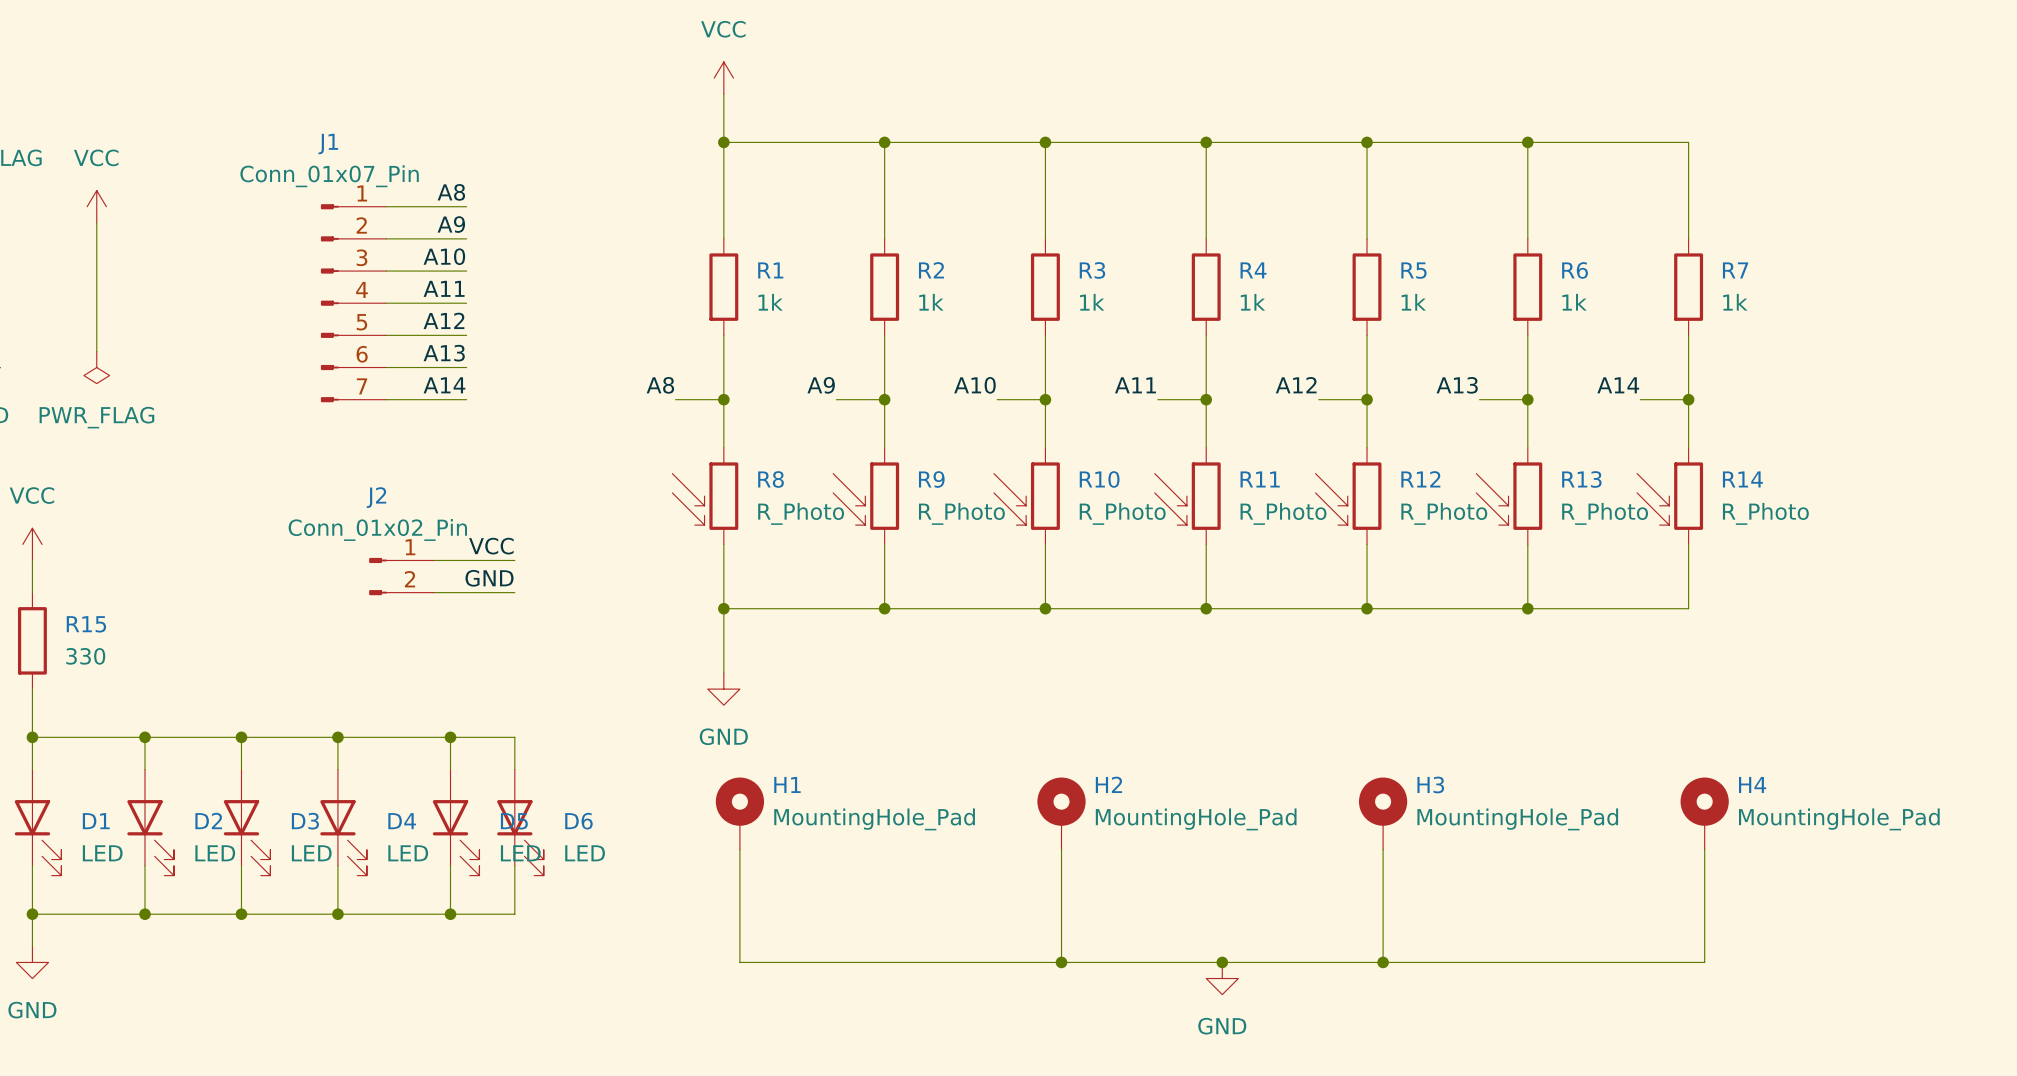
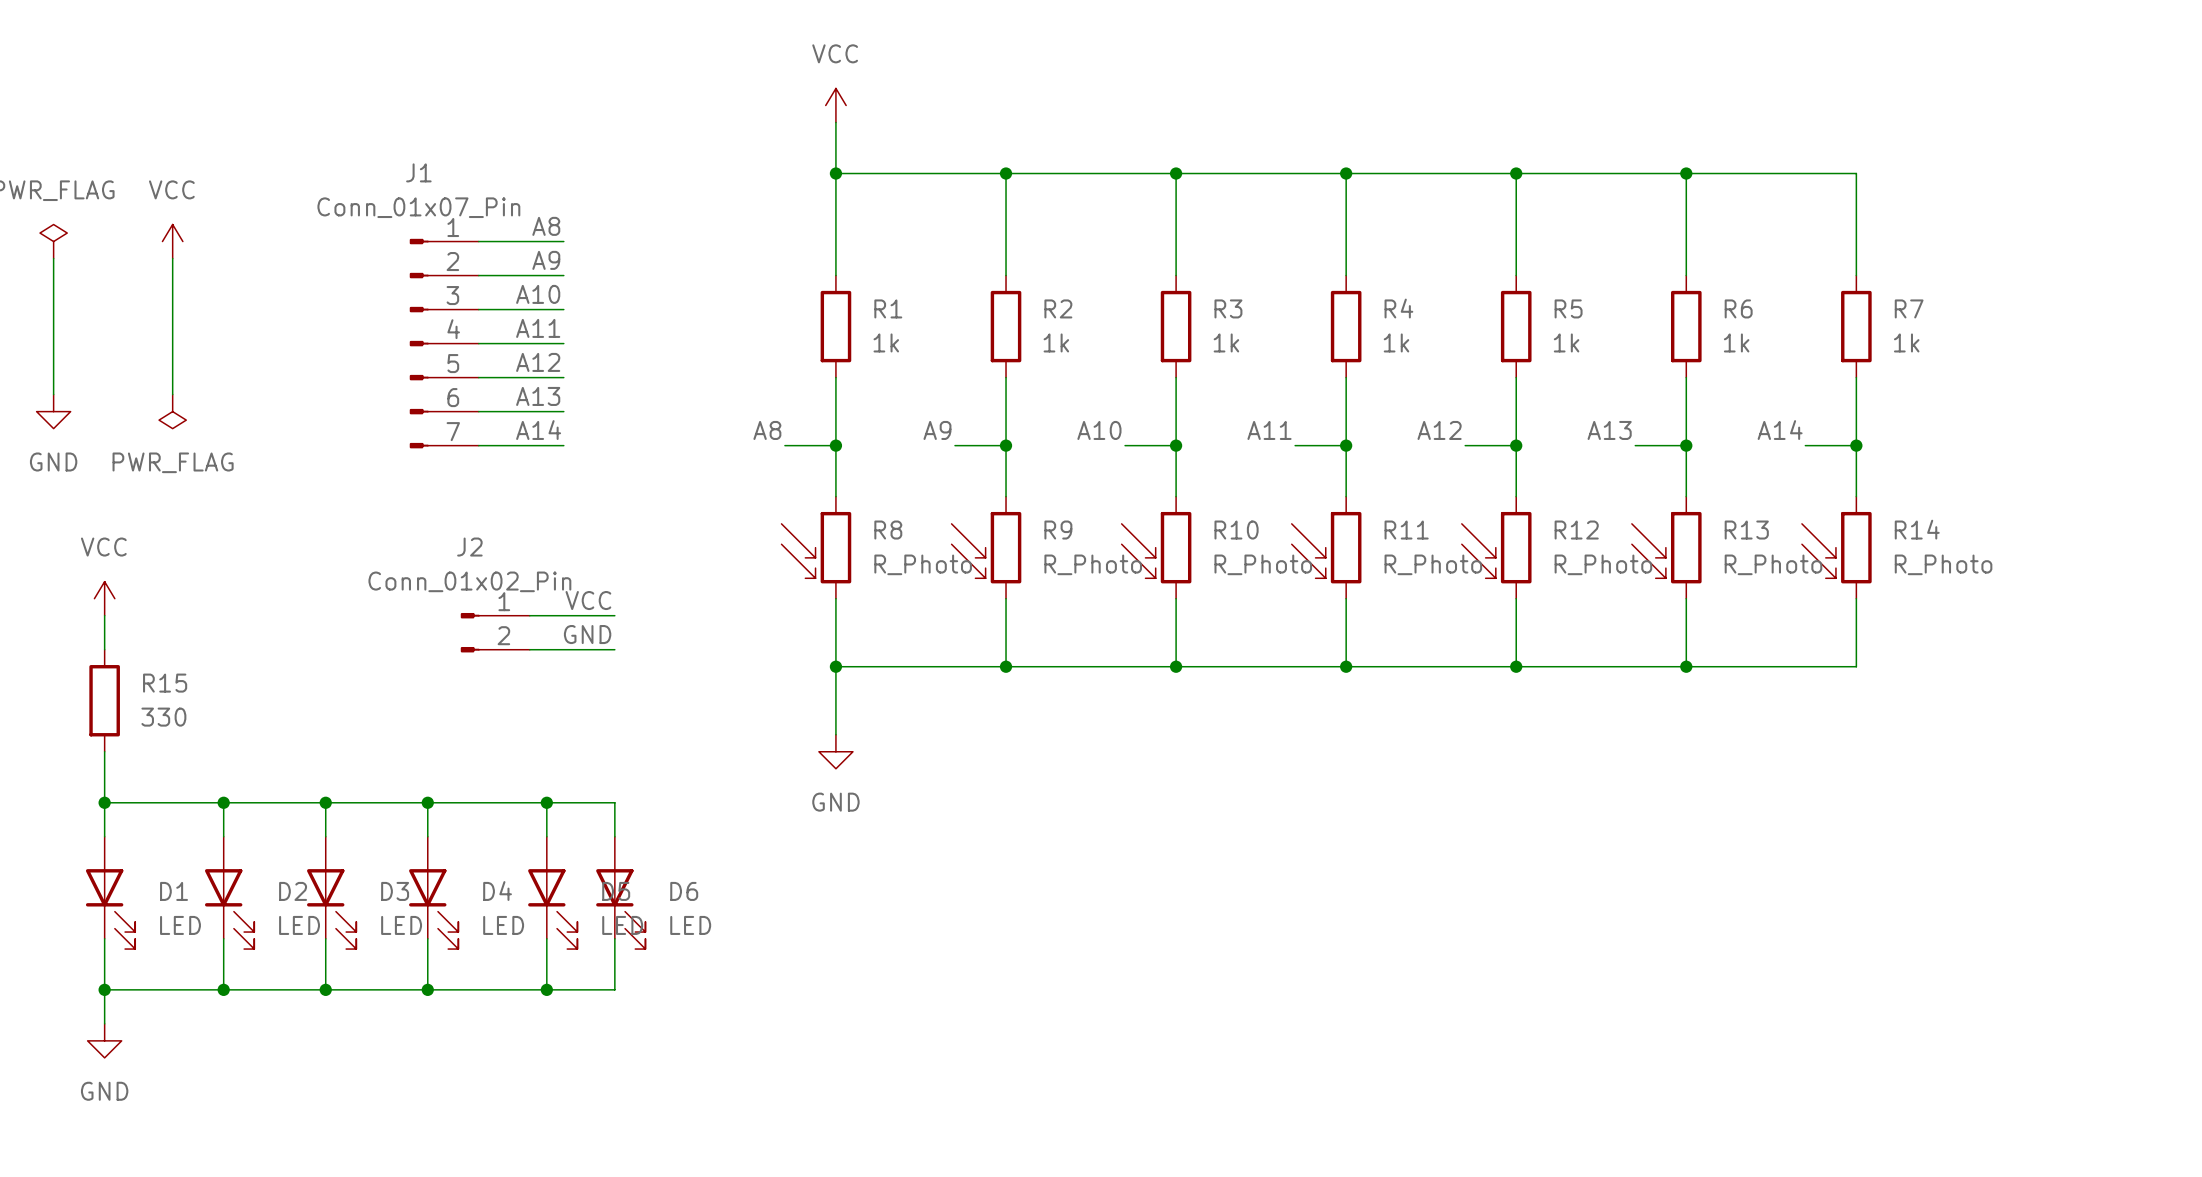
H1: MountingHole_Pad (739, 813) -> none
H2: MountingHole_Pad (1061, 813) -> none
H3: MountingHole_Pad (1383, 813) -> none
H4: MountingHole_Pad (1704, 813) -> none
wire: (739, 849) (739, 962) (1704, 962) (1704, 849) -> none
wire: (1061, 849) (1061, 962) -> none
wire: (1383, 849) (1383, 962) -> none
junction: (1061, 962) -> none
junction: (1222, 962) -> none
junction: (1383, 962) -> none
power symbol: GND (1222, 978) -> none

